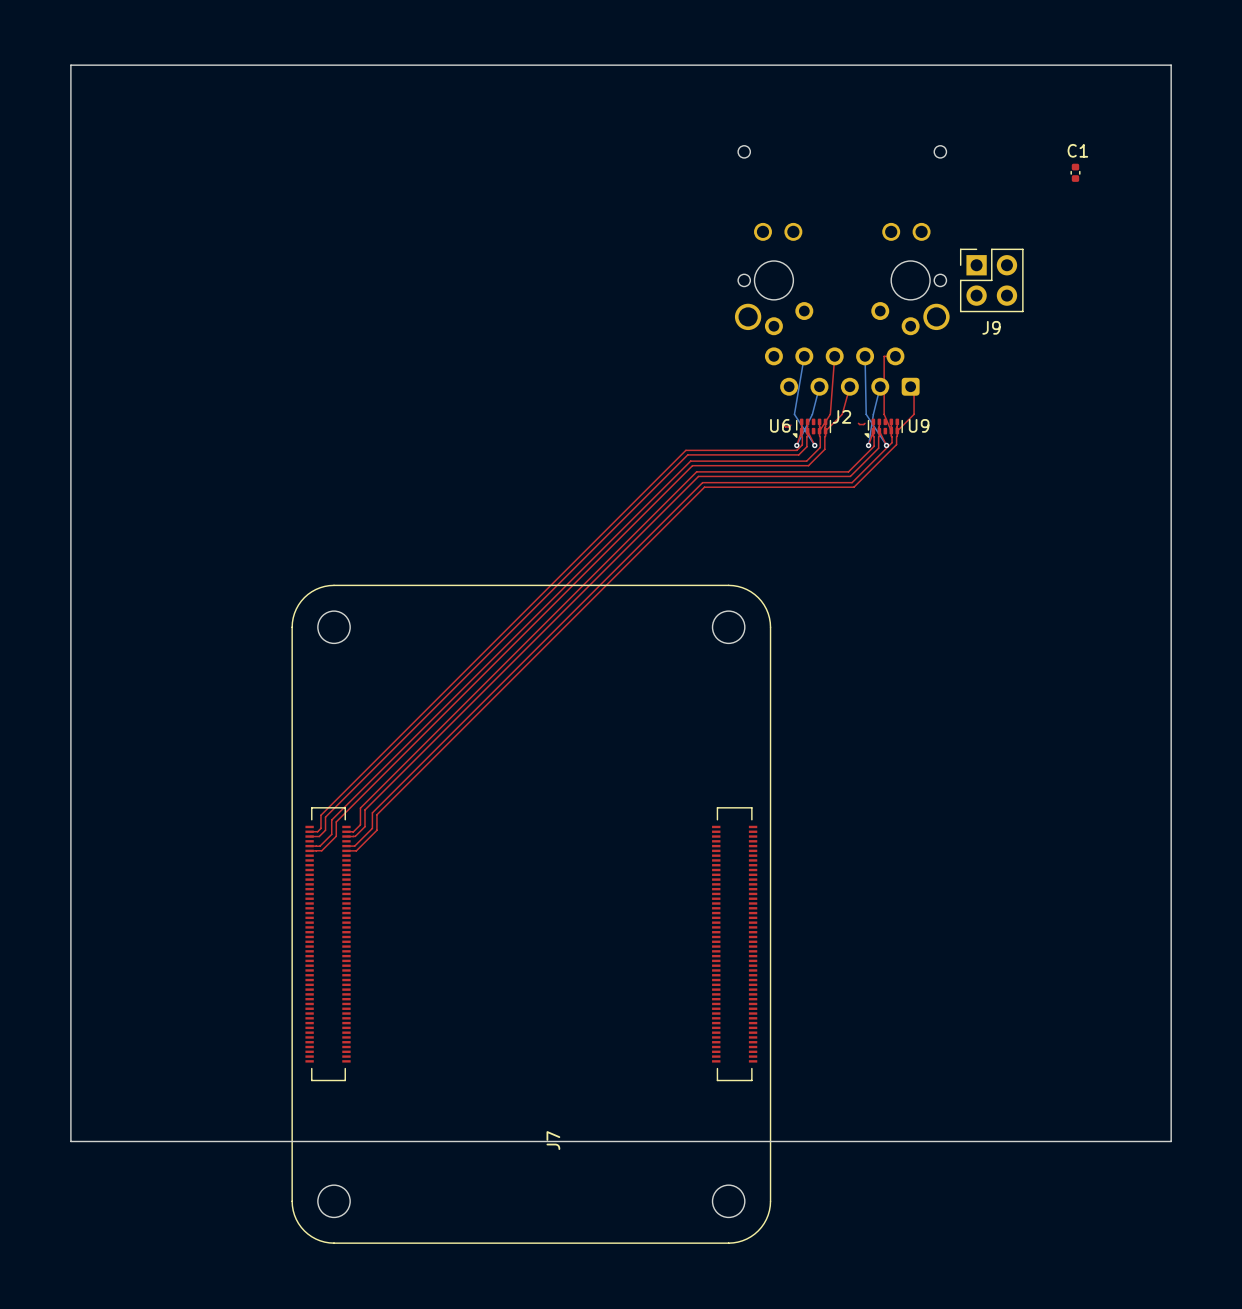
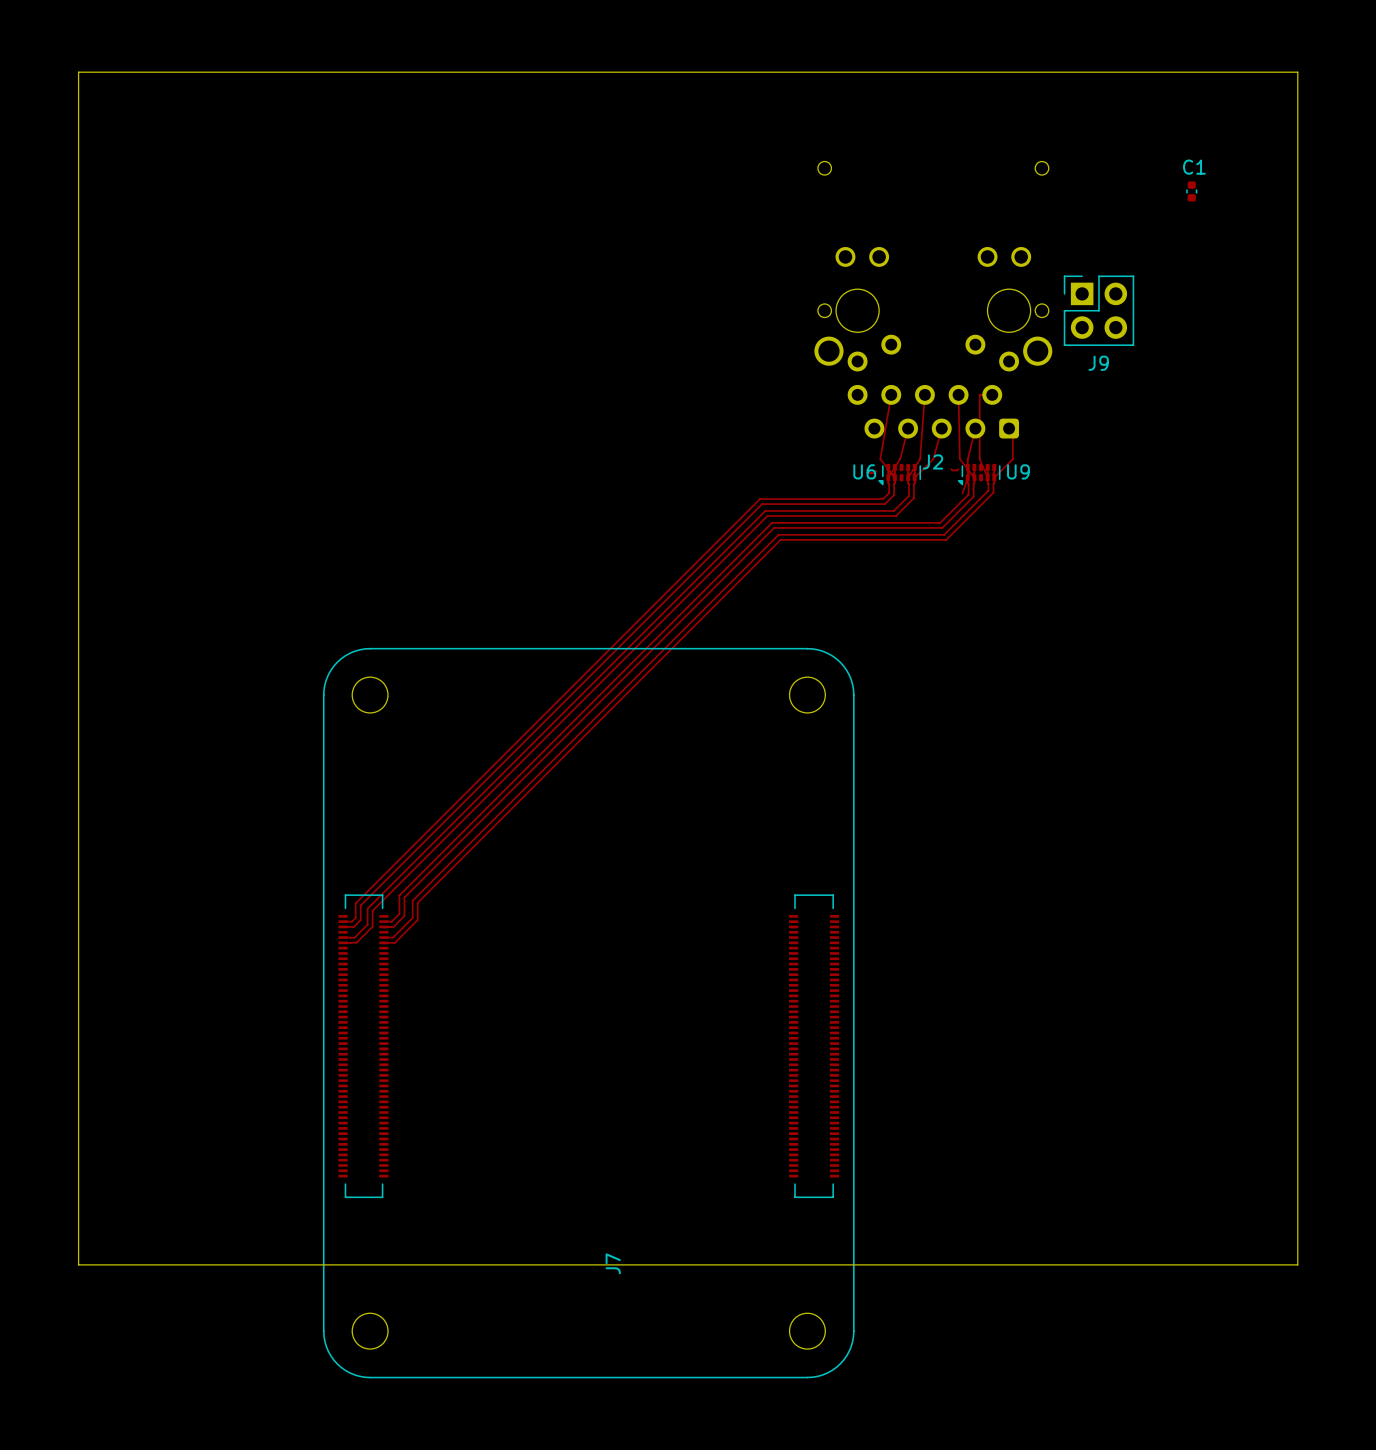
bottom track: (804, 356) (794, 414) (814, 445) -> none
bottom track: (865, 356) (866, 414) (886, 445) -> none
bottom track: (819, 386) (812, 414) (796, 445) -> none
top track: none -> (975, 428) (967, 459) (967, 467)
bottom track: (880, 386) (868, 445) -> none
top track: (801, 431) (796, 445) -> (888, 477) (900, 459) (908, 428)
top track: (807, 431) (814, 445) -> (894, 477) (880, 459) (891, 394)
top track: (879, 431) (886, 445) -> (974, 477) (959, 459) (958, 394)
via: (796, 445) -> none
via: (814, 445) -> none
via: (868, 445) -> none
via: (886, 445) -> none

